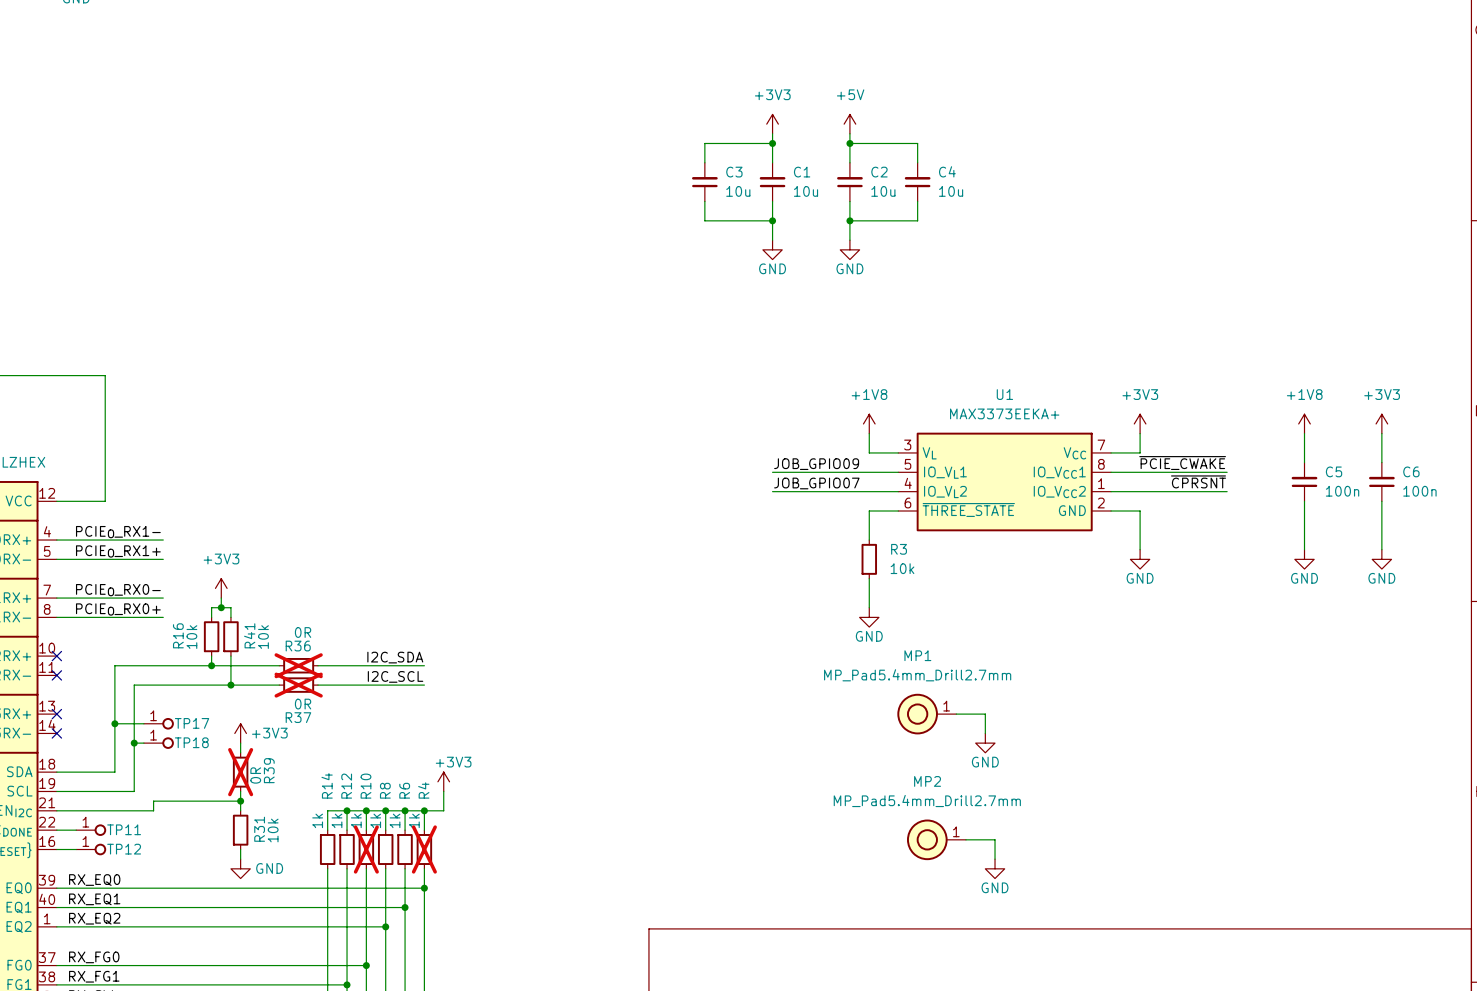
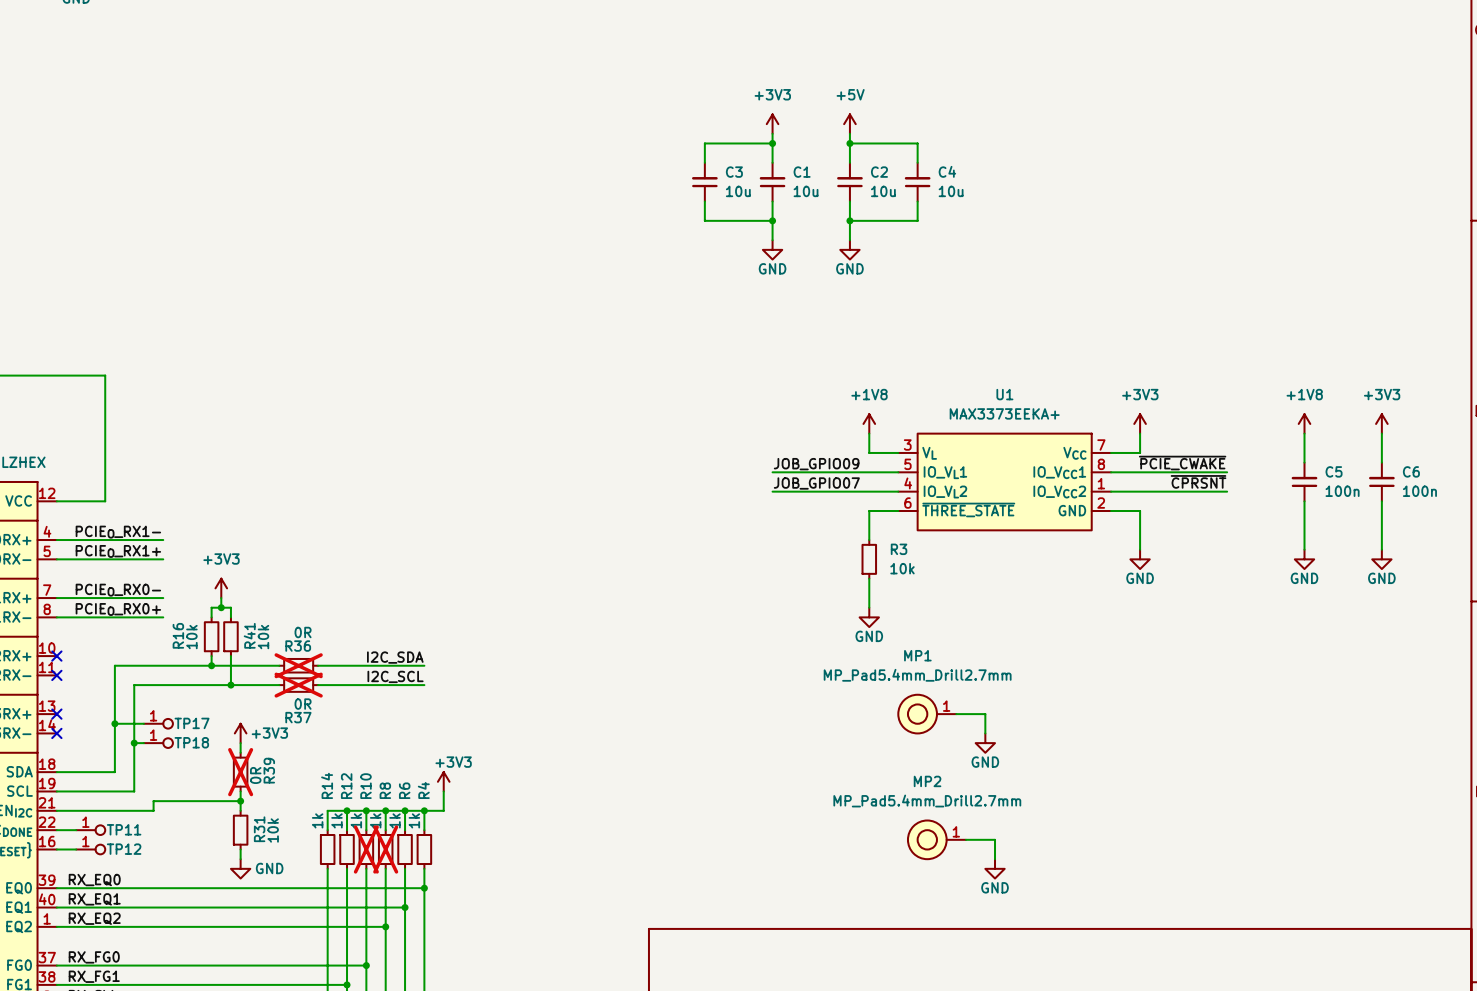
R8 do-not-place cross: none -> (385, 849)
R4 do-not-place cross: (424, 849) -> none

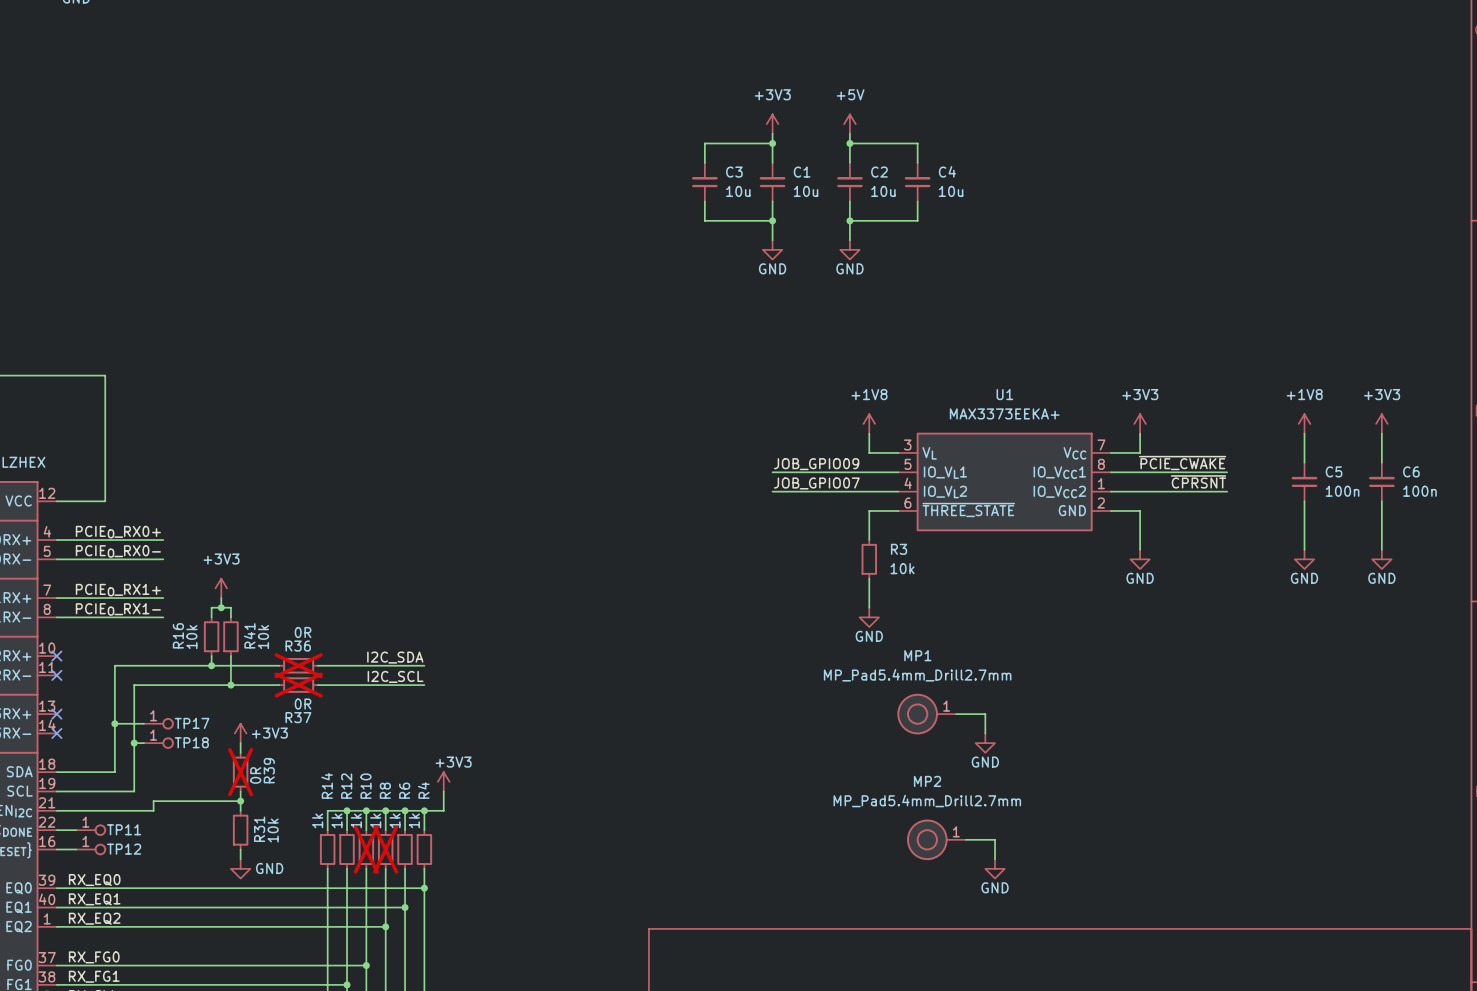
label: PCIEO_RX1- (118, 532) -> PCIEO_RX0+ (118, 532)
label: PCIEO_RX1+ (118, 551) -> PCIEO_RX0- (118, 551)
label: PCIEO_RX0- (118, 590) -> PCIEO_RX1+ (118, 590)
label: PCIEO_RX0+ (118, 609) -> PCIEO_RX1- (118, 609)

